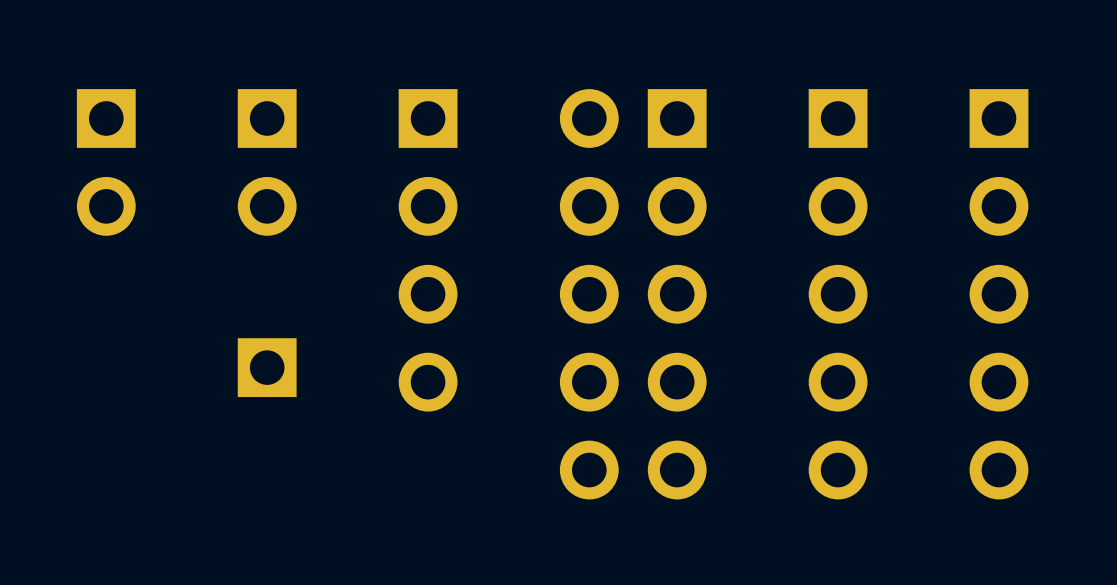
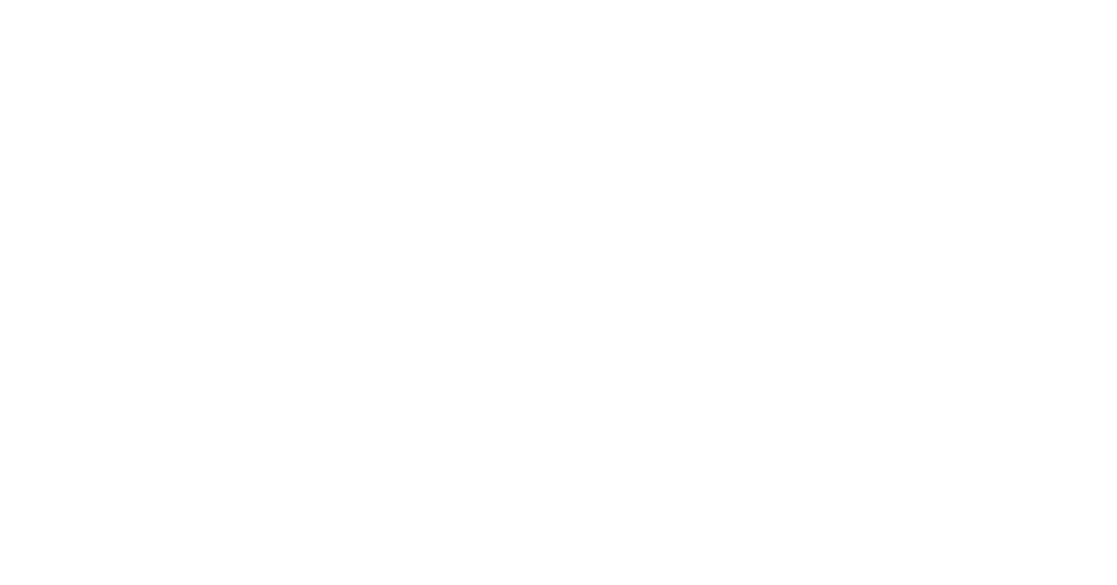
part: (106, 162) -> none
part: (267, 162) -> none
part: (428, 250) -> none
part: (633, 294) -> none
part: (838, 294) -> none
part: (998, 294) -> none
part: (267, 367) -> none

